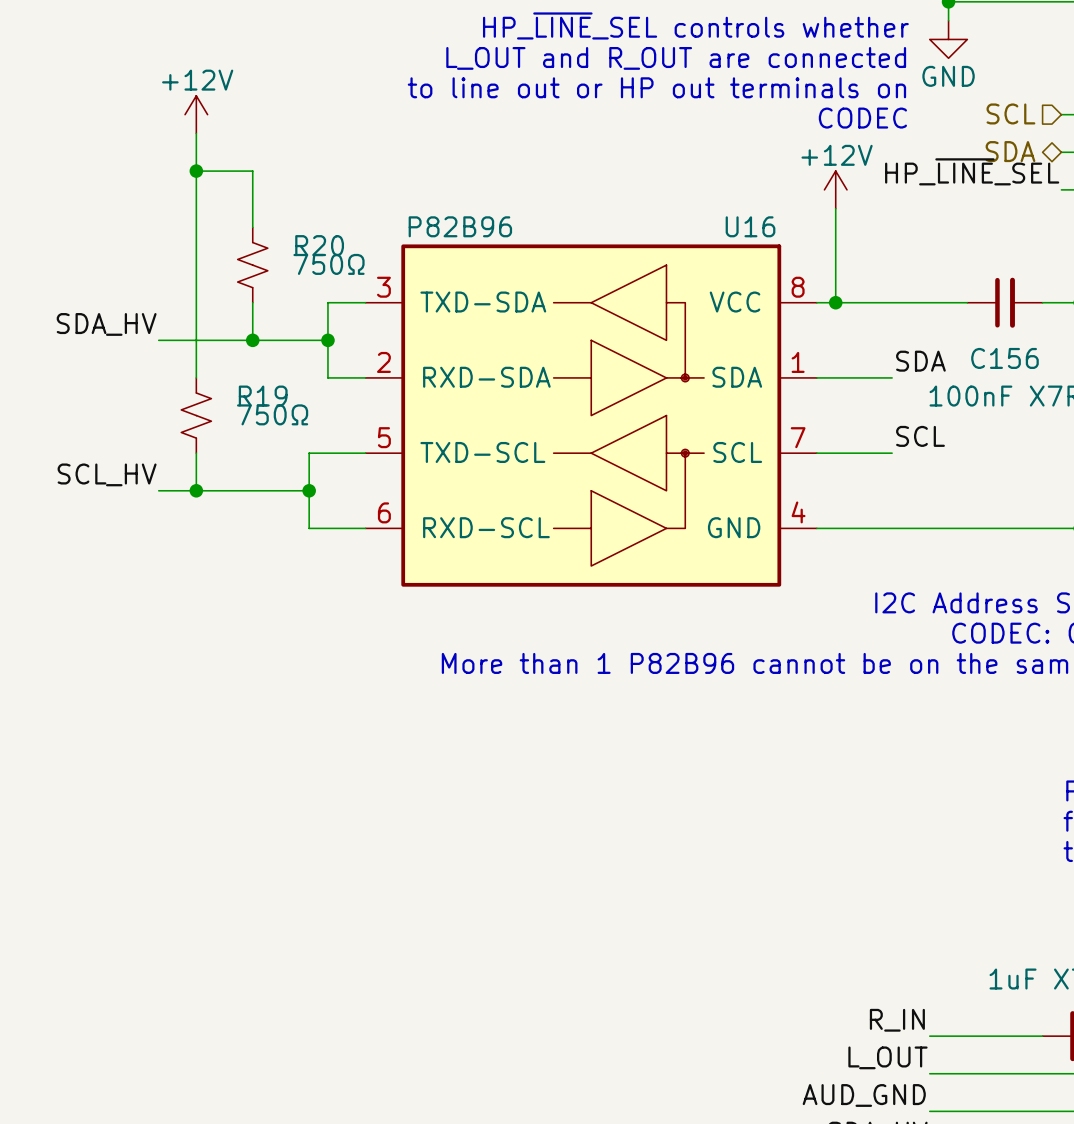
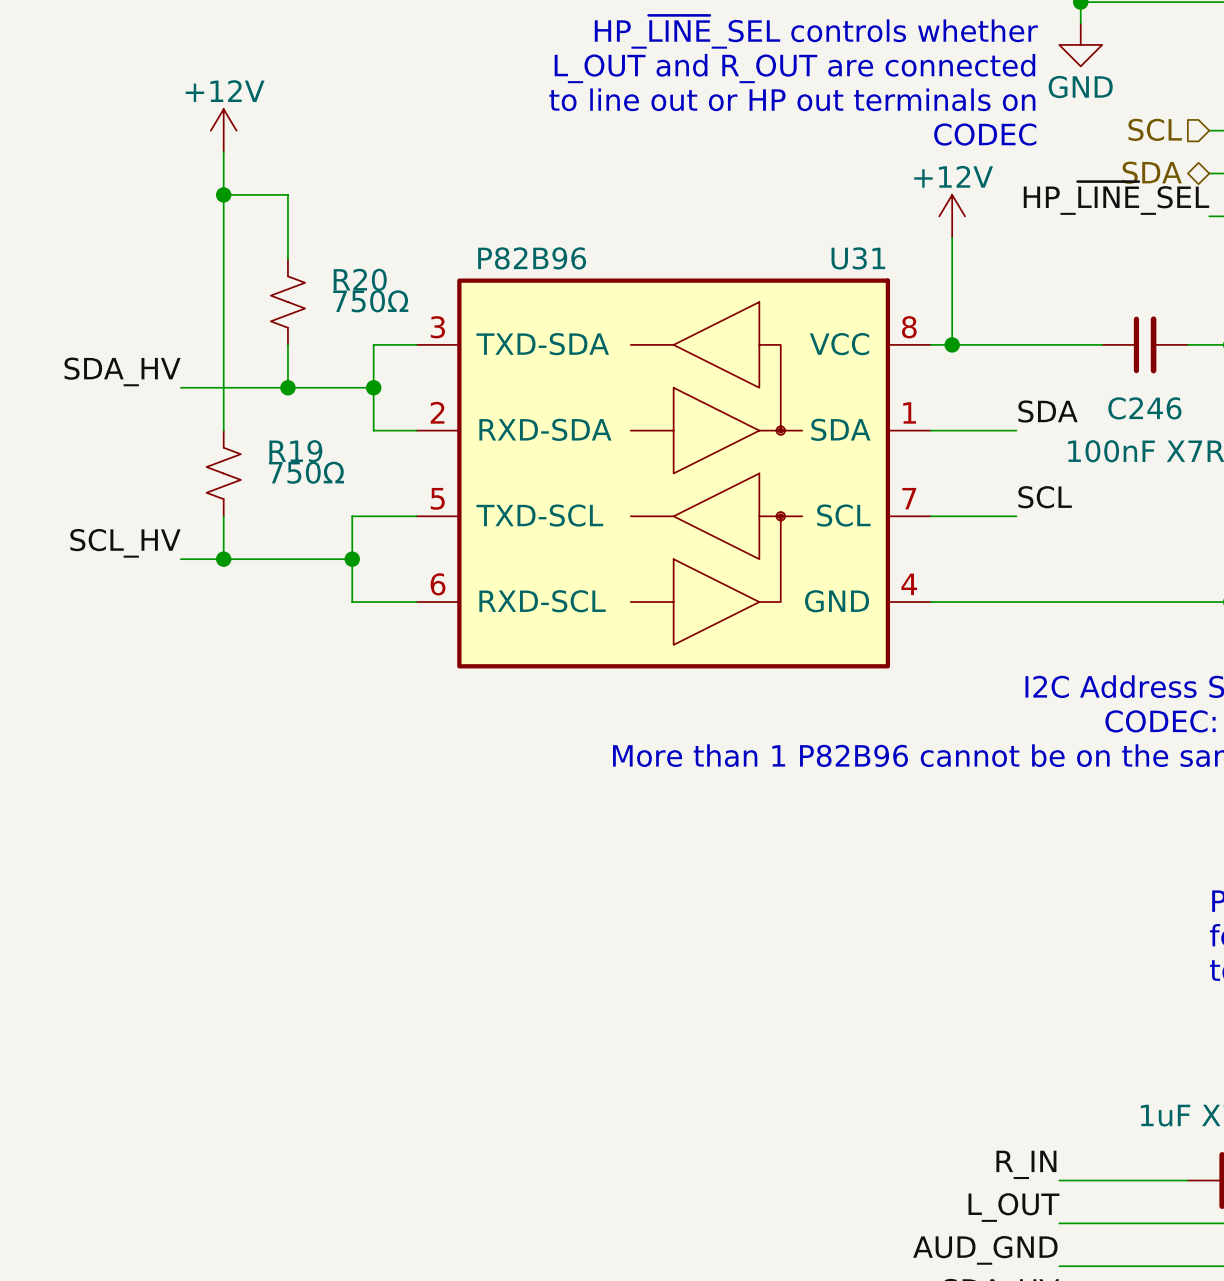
U16 name: U16 (750, 226) -> U31 (858, 258)
C156 name: C156 (1004, 358) -> C246 (1144, 408)

